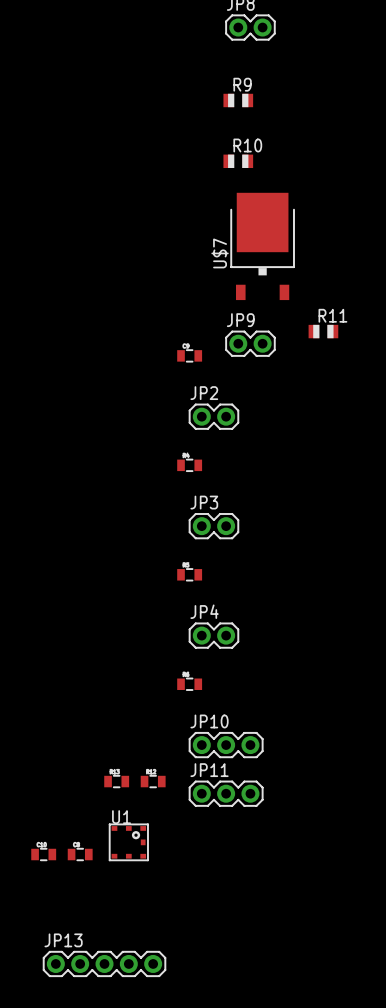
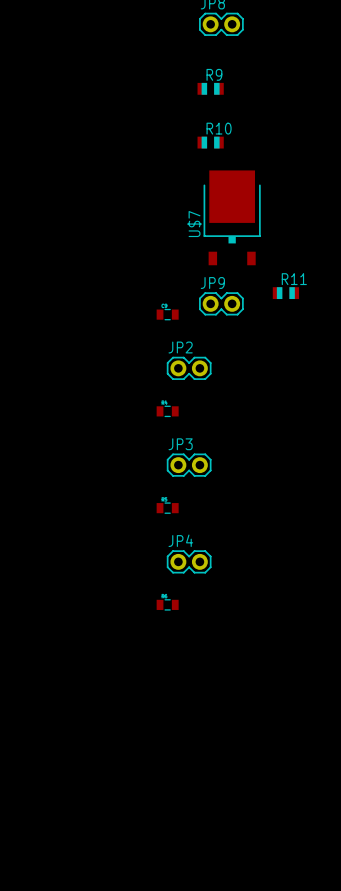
JP10: (226, 745) -> none
part: (116, 781) -> none
part: (153, 781) -> none
JP11: (226, 793) -> none
U1: (128, 842) -> none
part: (43, 854) -> none
part: (80, 854) -> none
JP13: (104, 963) -> none

